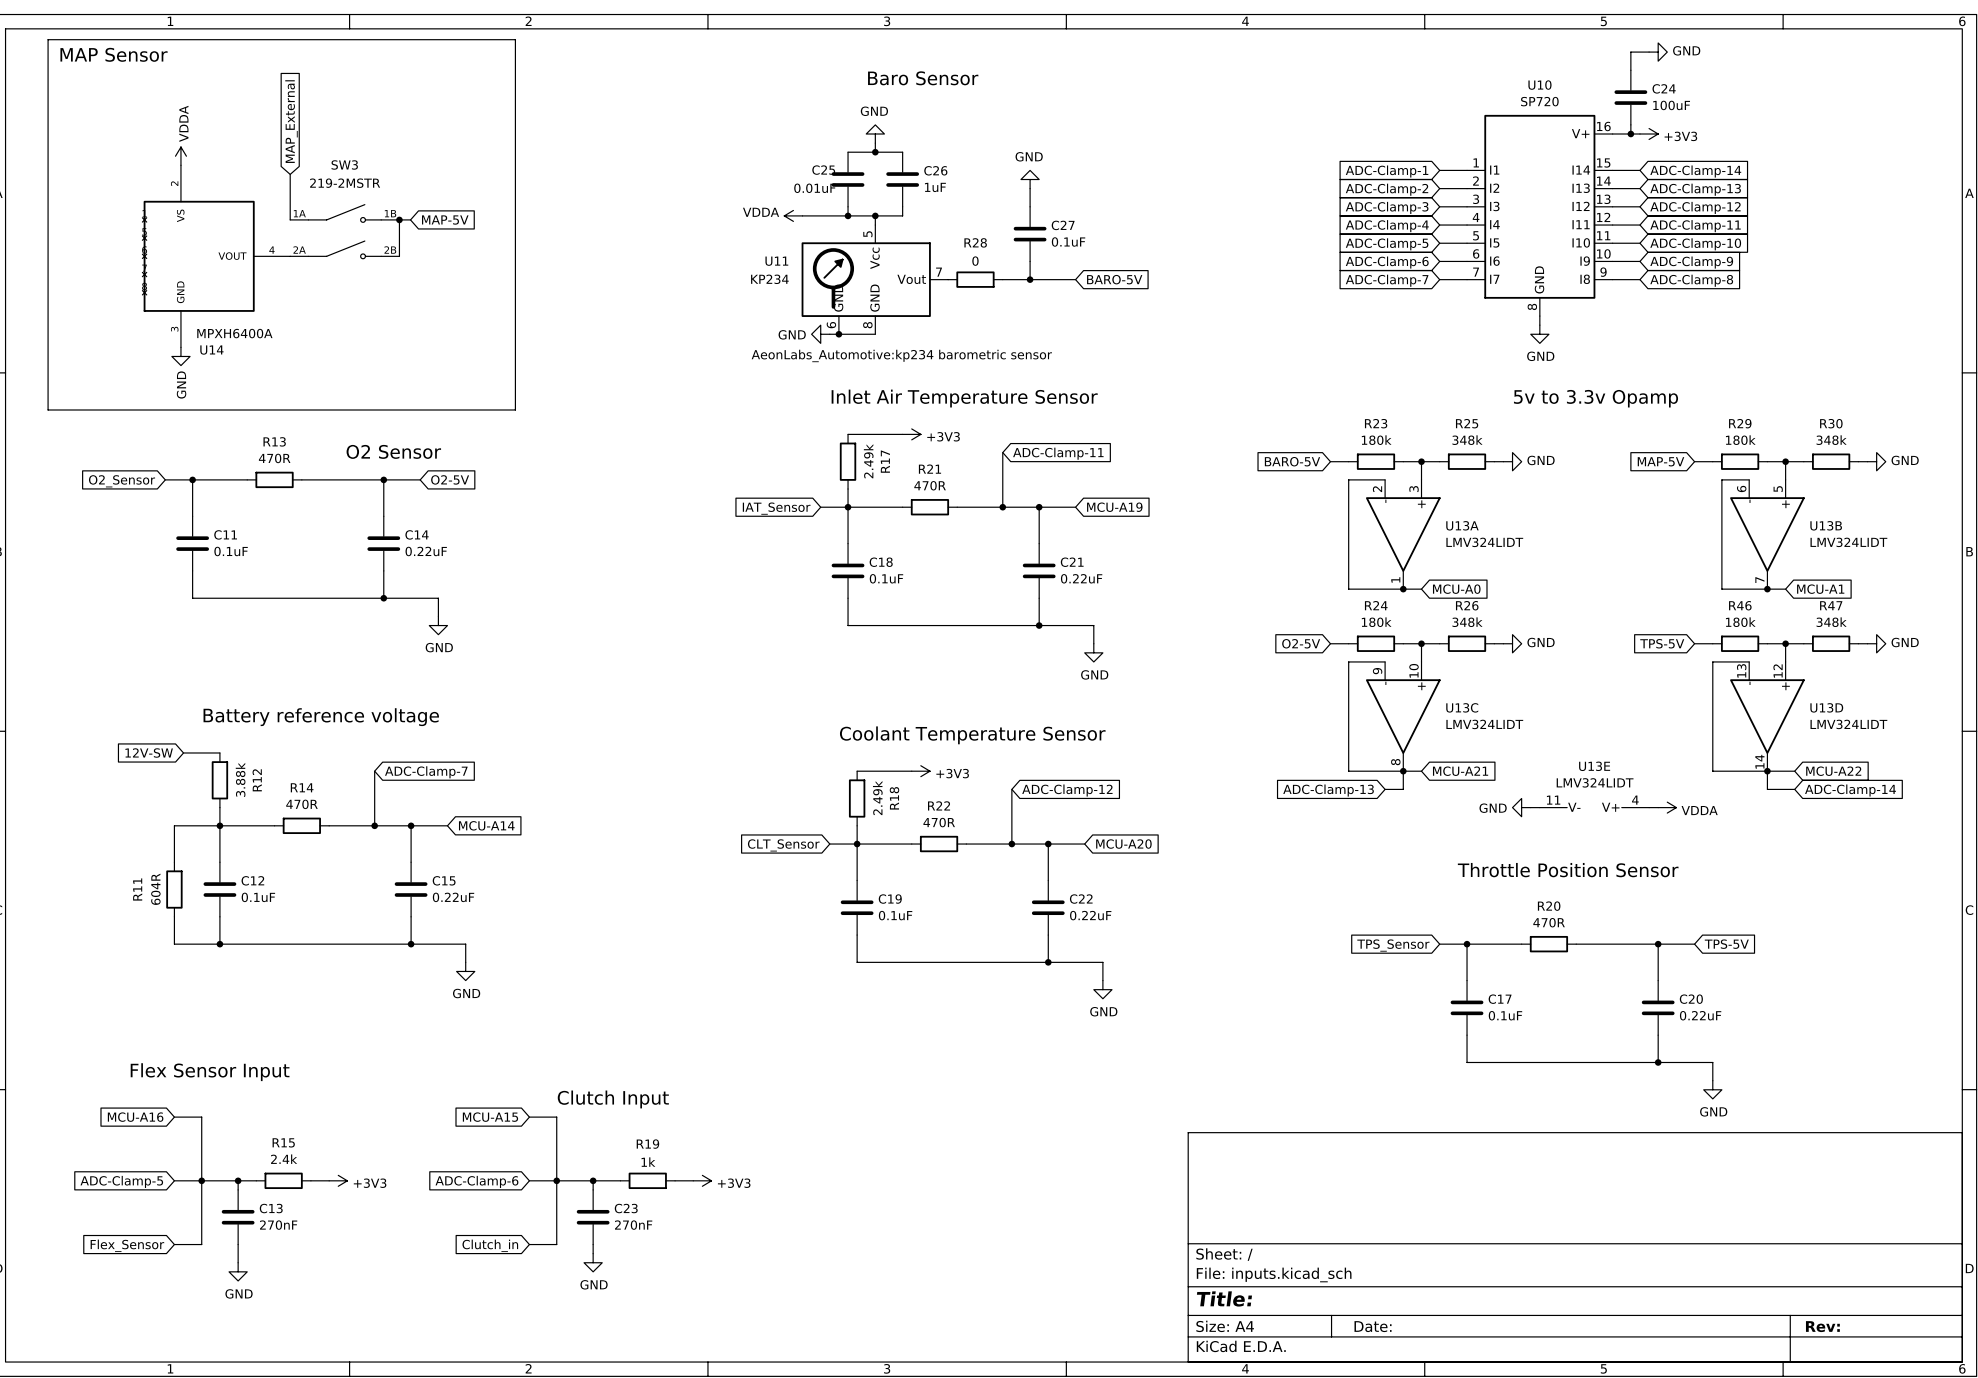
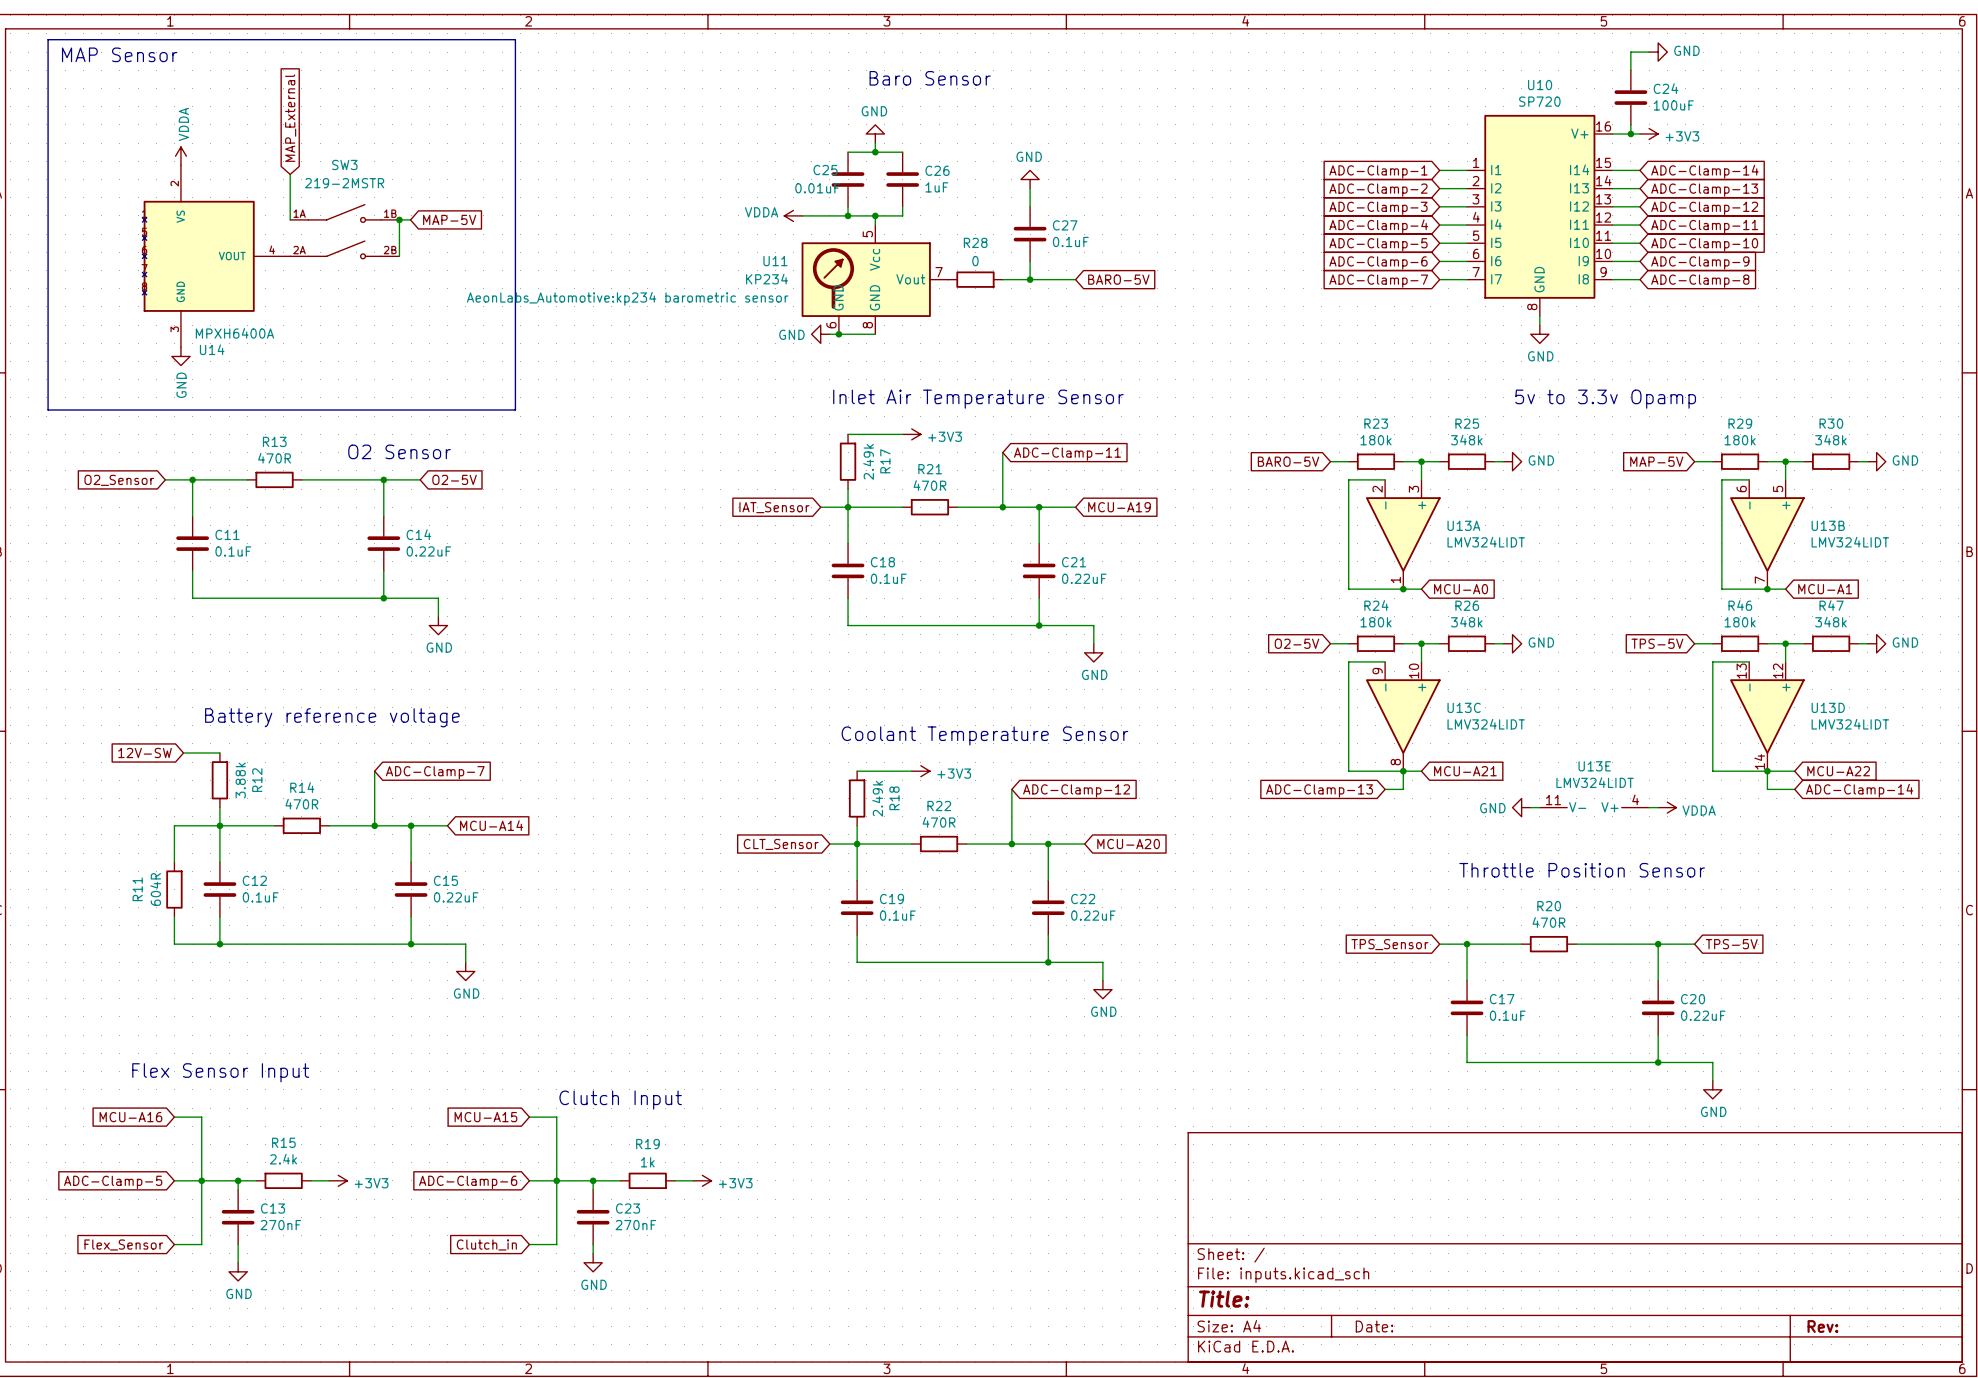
U11 text position: AeonLabs_Automotive:kp234 barometric sensor (901, 355) -> AeonLabs_Automotive:kp234 barometric sensor (627, 298)

